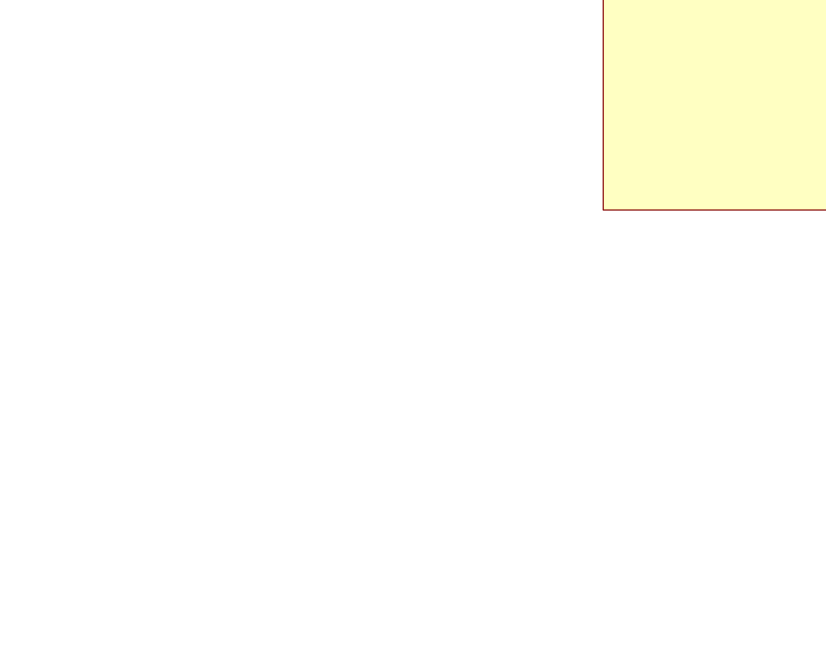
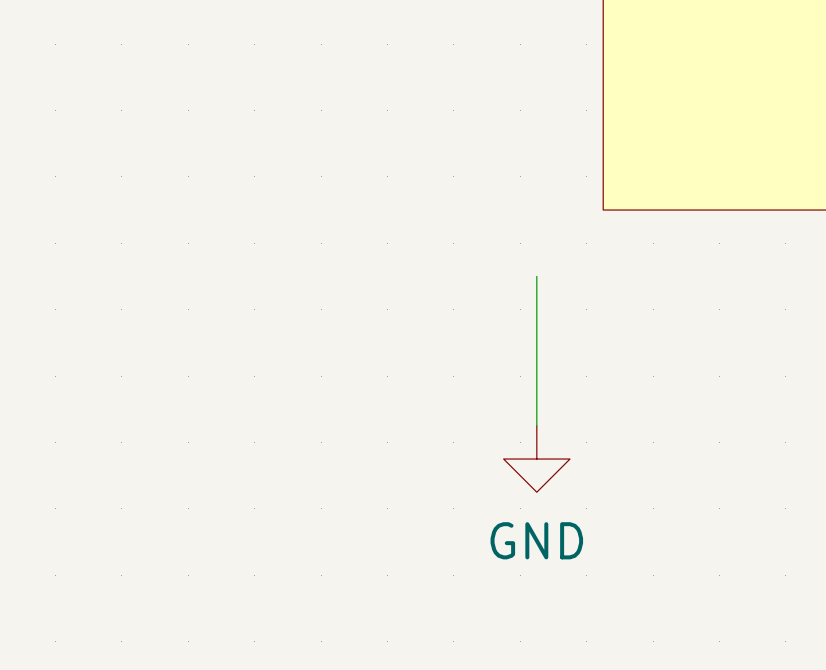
wire: none -> (536, 276) (536, 425)
power symbol: none -> GND (536, 459)

